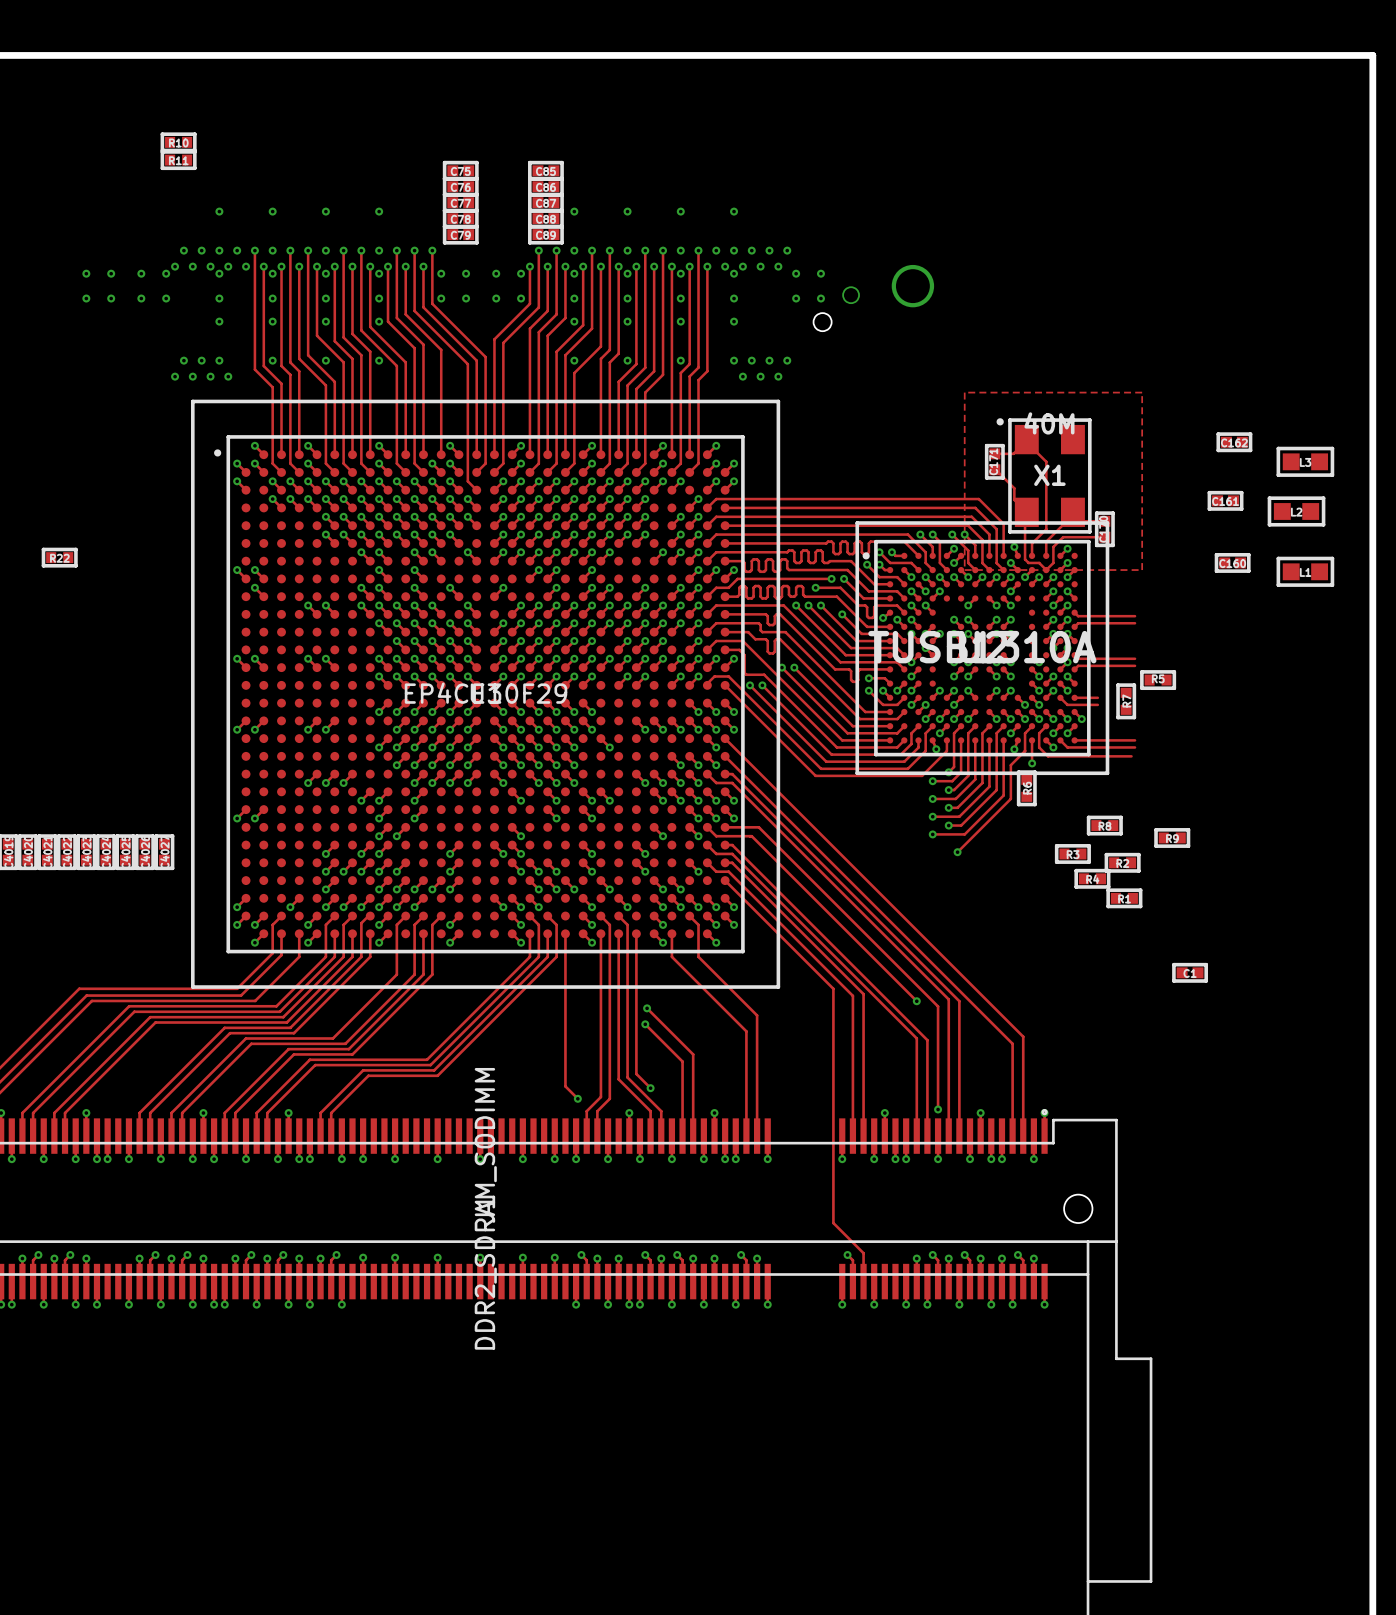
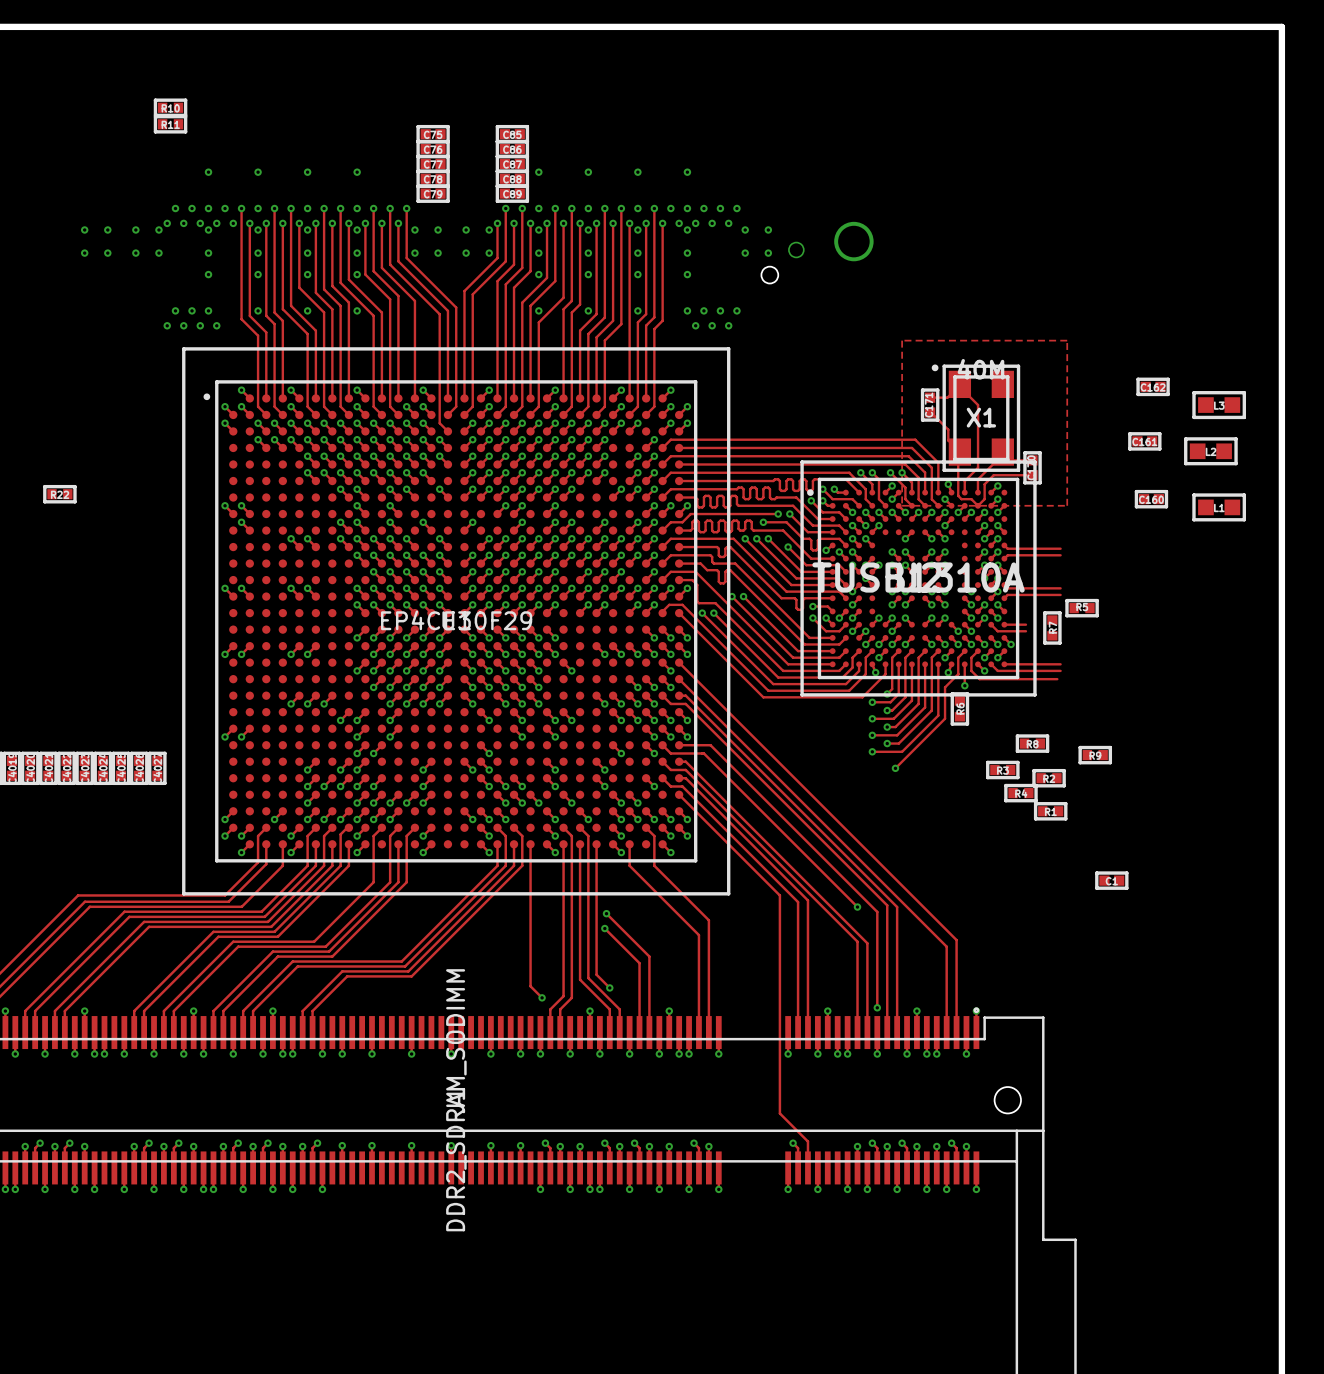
X1 footprint: [996, 418, 1092, 534] -> [931, 364, 1021, 472]

